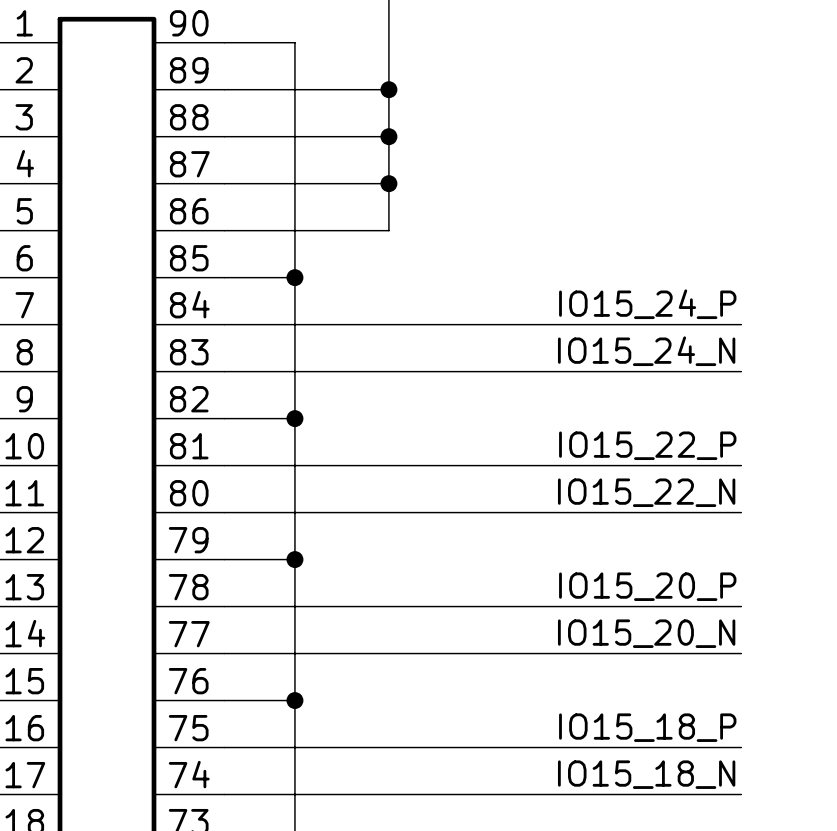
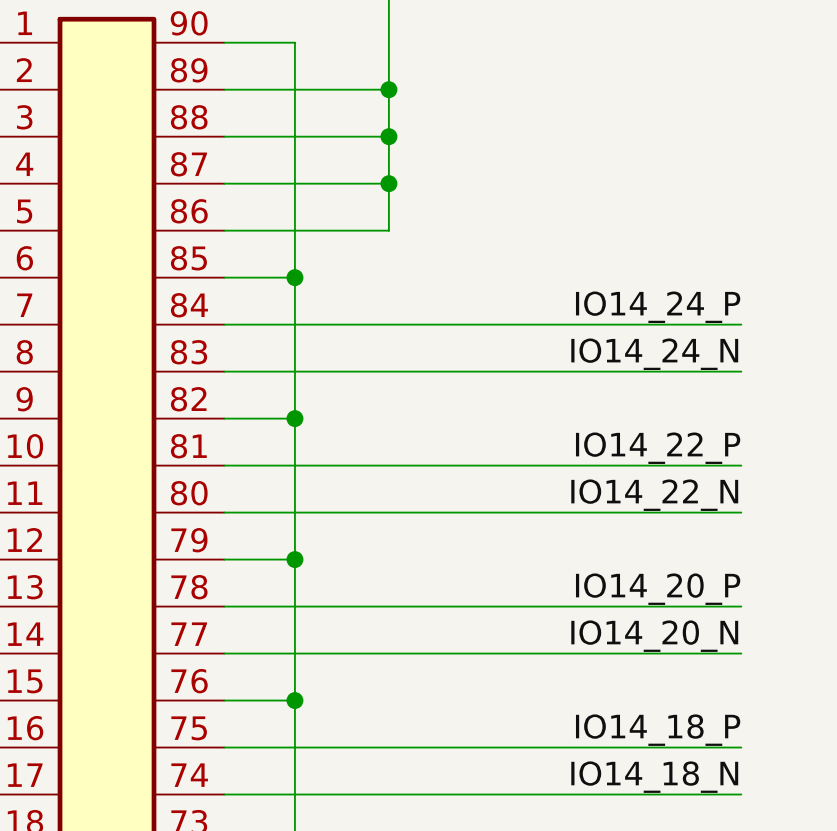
label: IO15_24_P (647, 304) -> IO14_24_P (658, 307)
label: IO15_24_N (646, 351) -> IO14_24_N (654, 354)
label: IO15_22_P (647, 445) -> IO14_22_P (658, 448)
label: IO15_22_N (646, 492) -> IO14_22_N (654, 495)
label: IO15_20_P (647, 586) -> IO14_20_P (658, 589)
label: IO15_20_N (646, 633) -> IO14_20_N (654, 636)
label: IO15_18_P (647, 727) -> IO14_18_P (658, 730)
label: IO15_18_N (646, 774) -> IO14_18_N (654, 777)

